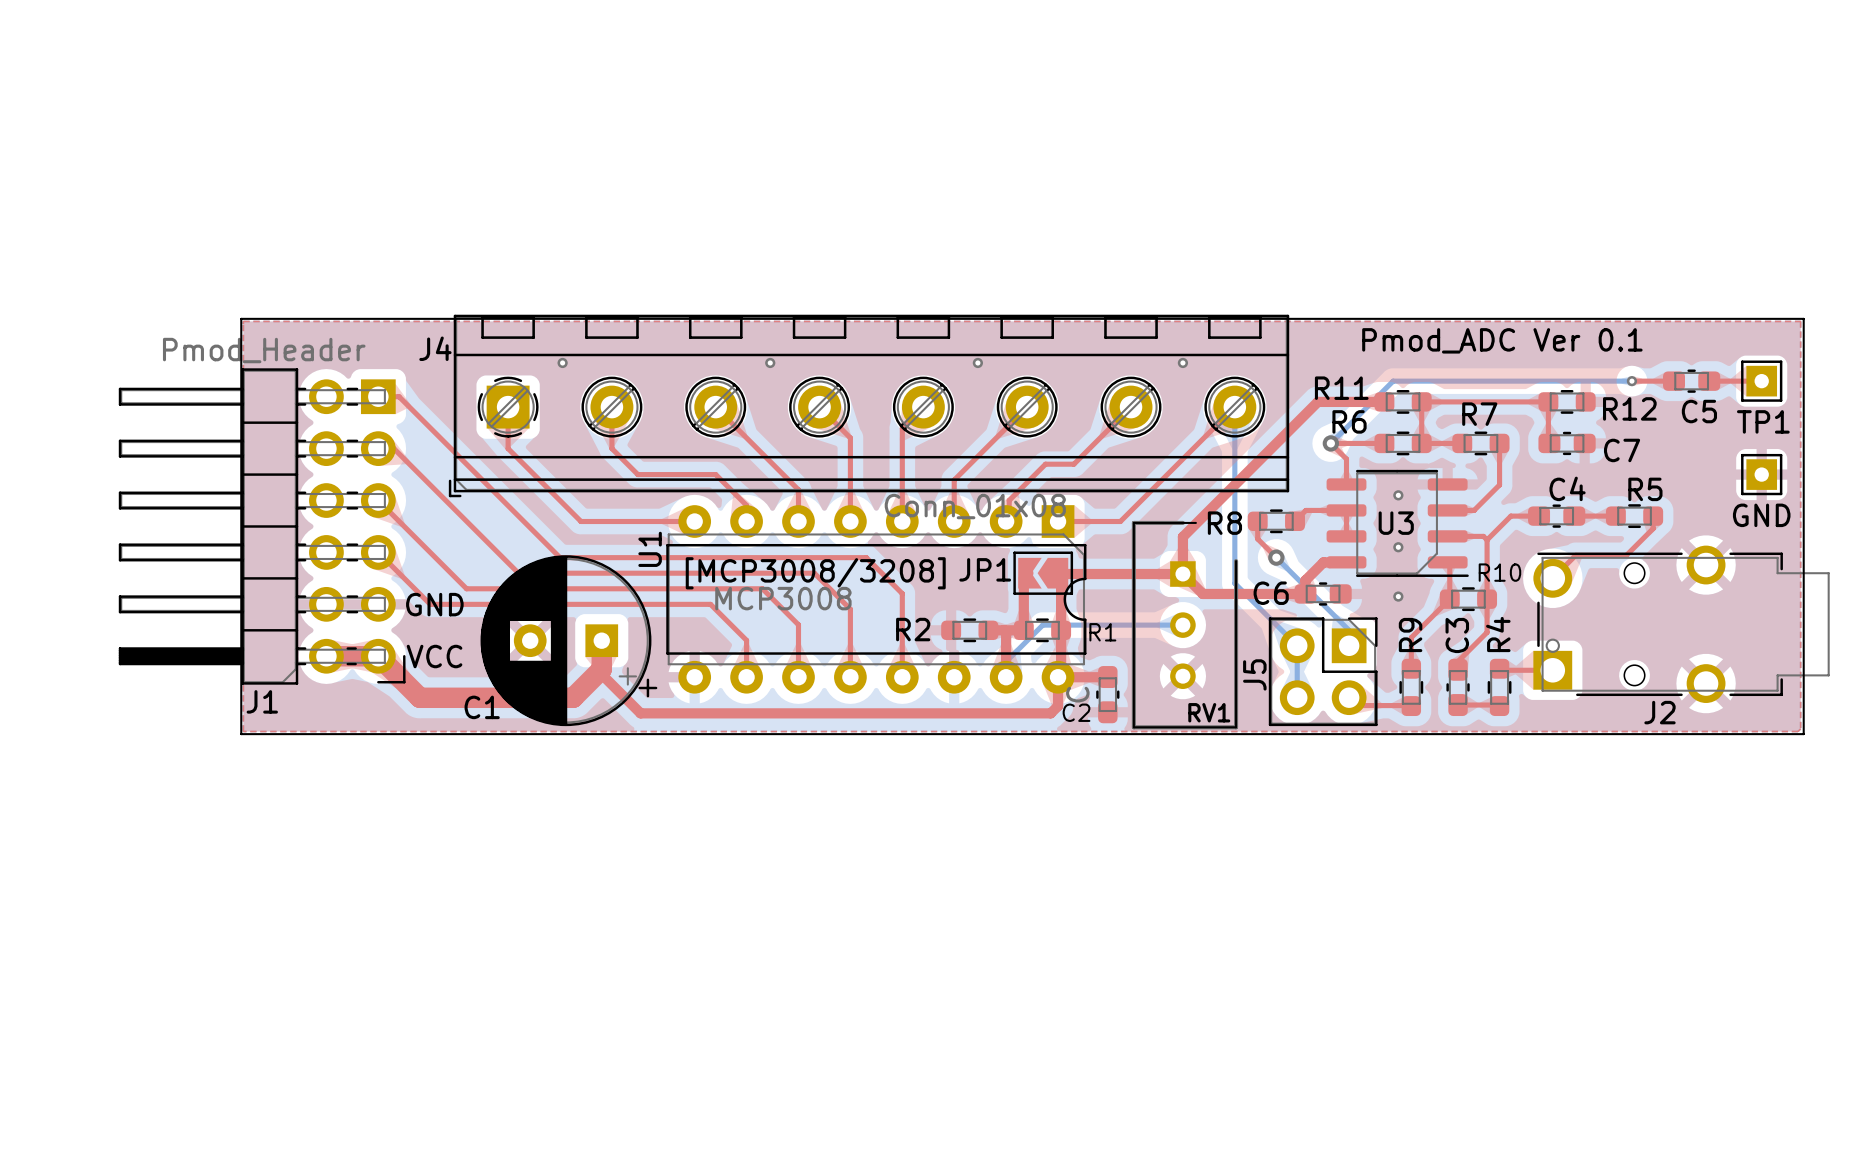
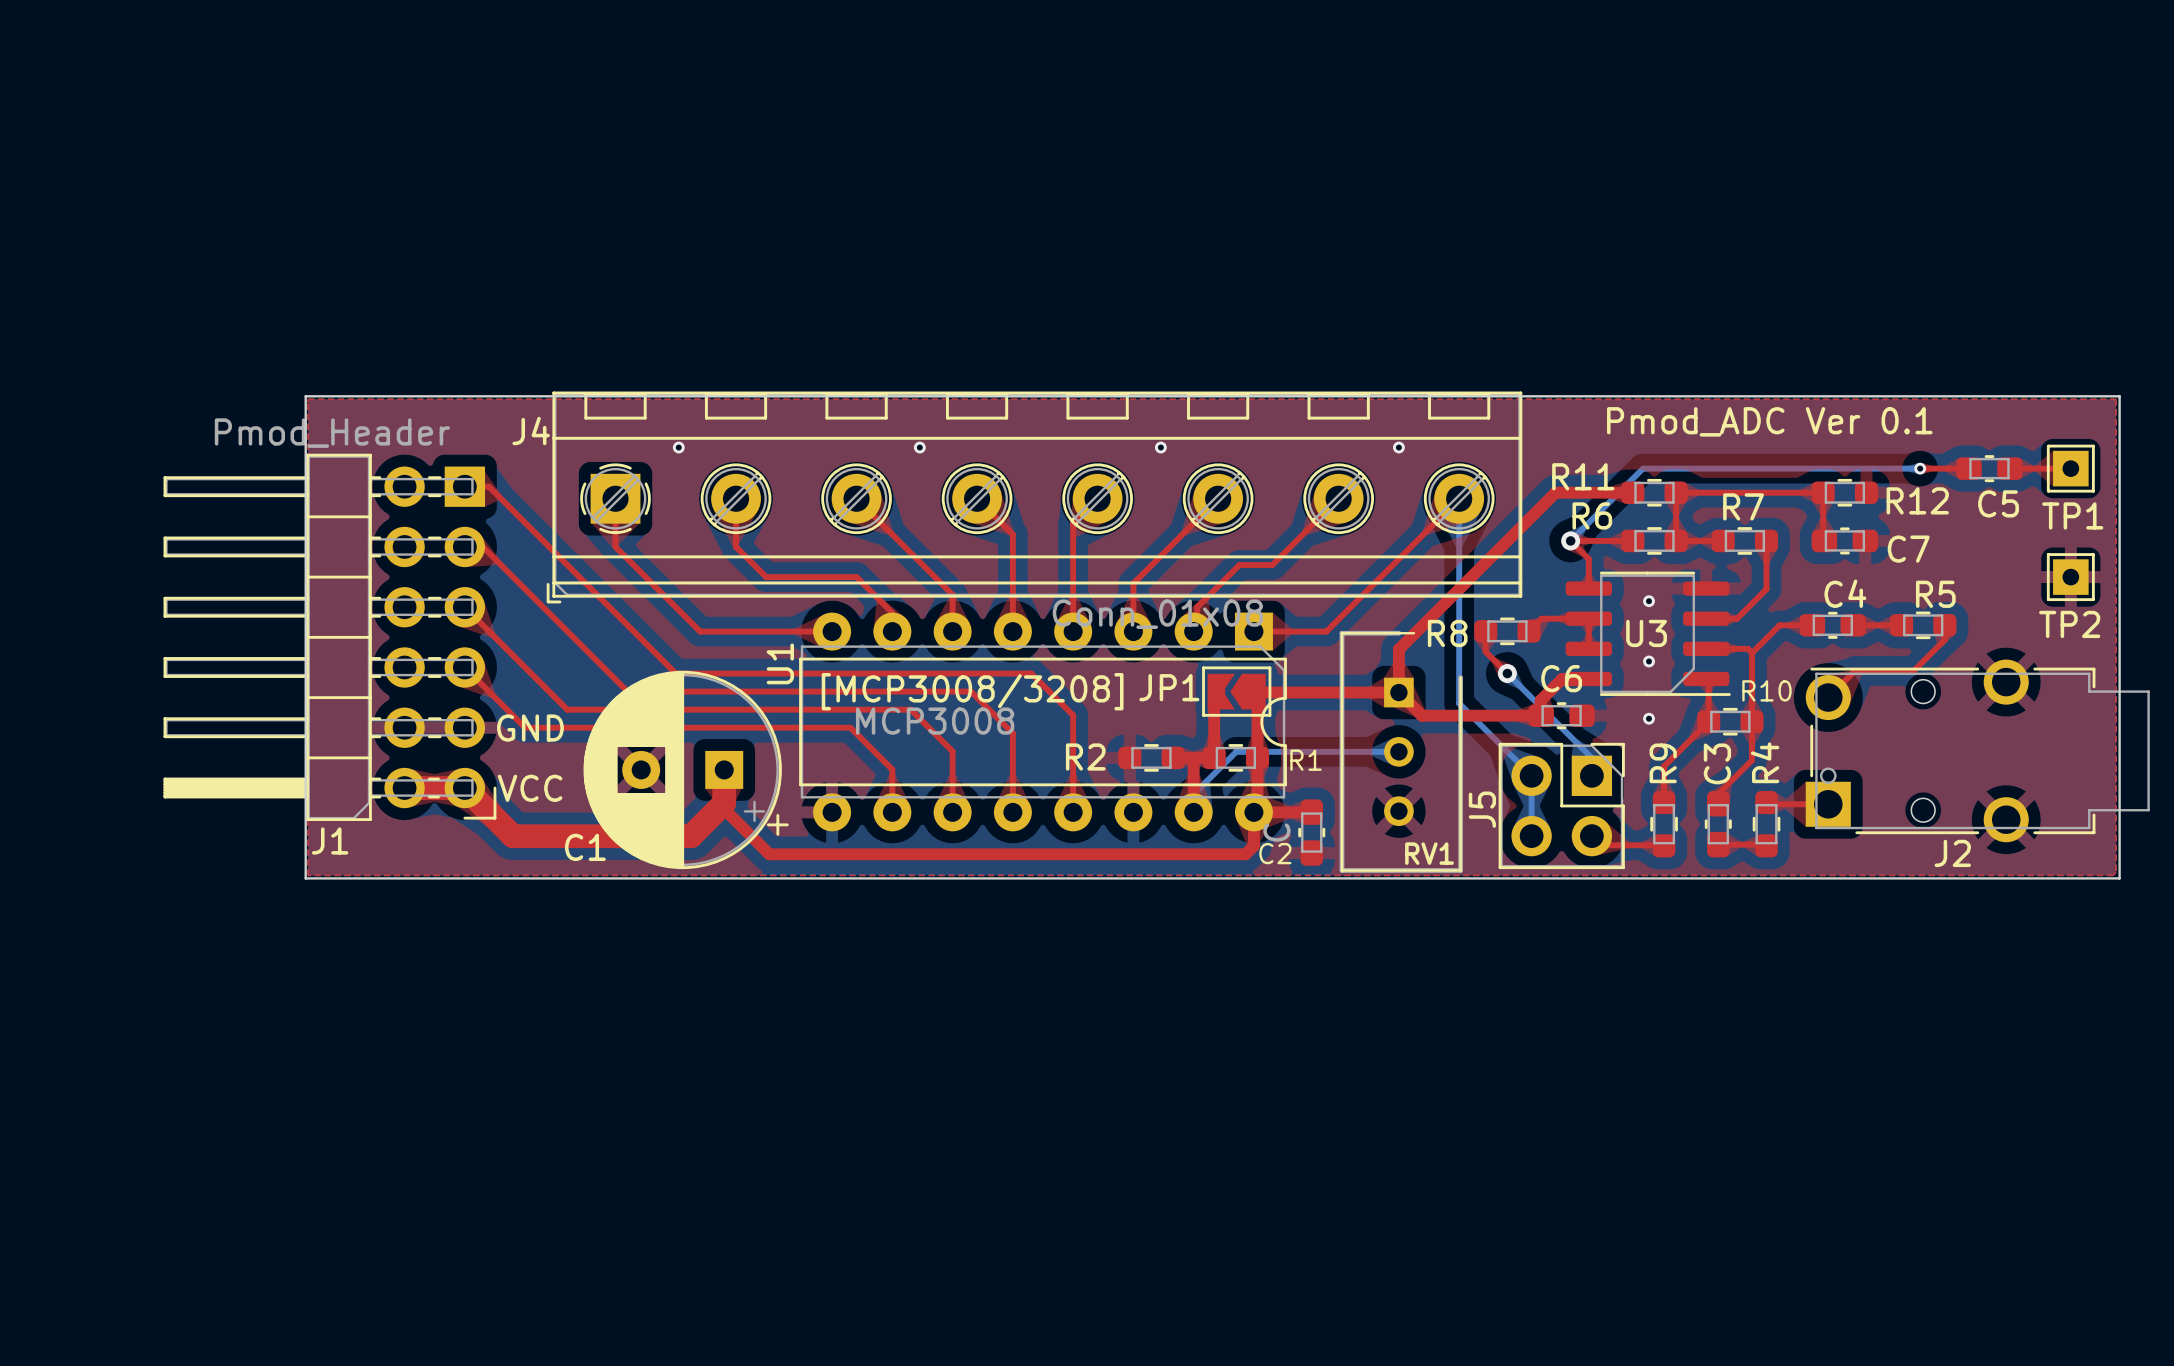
GND name: GND (1761, 515) -> TP2 (2069, 624)
C6 name position: C6 (1271, 593) -> C6 (1561, 678)

